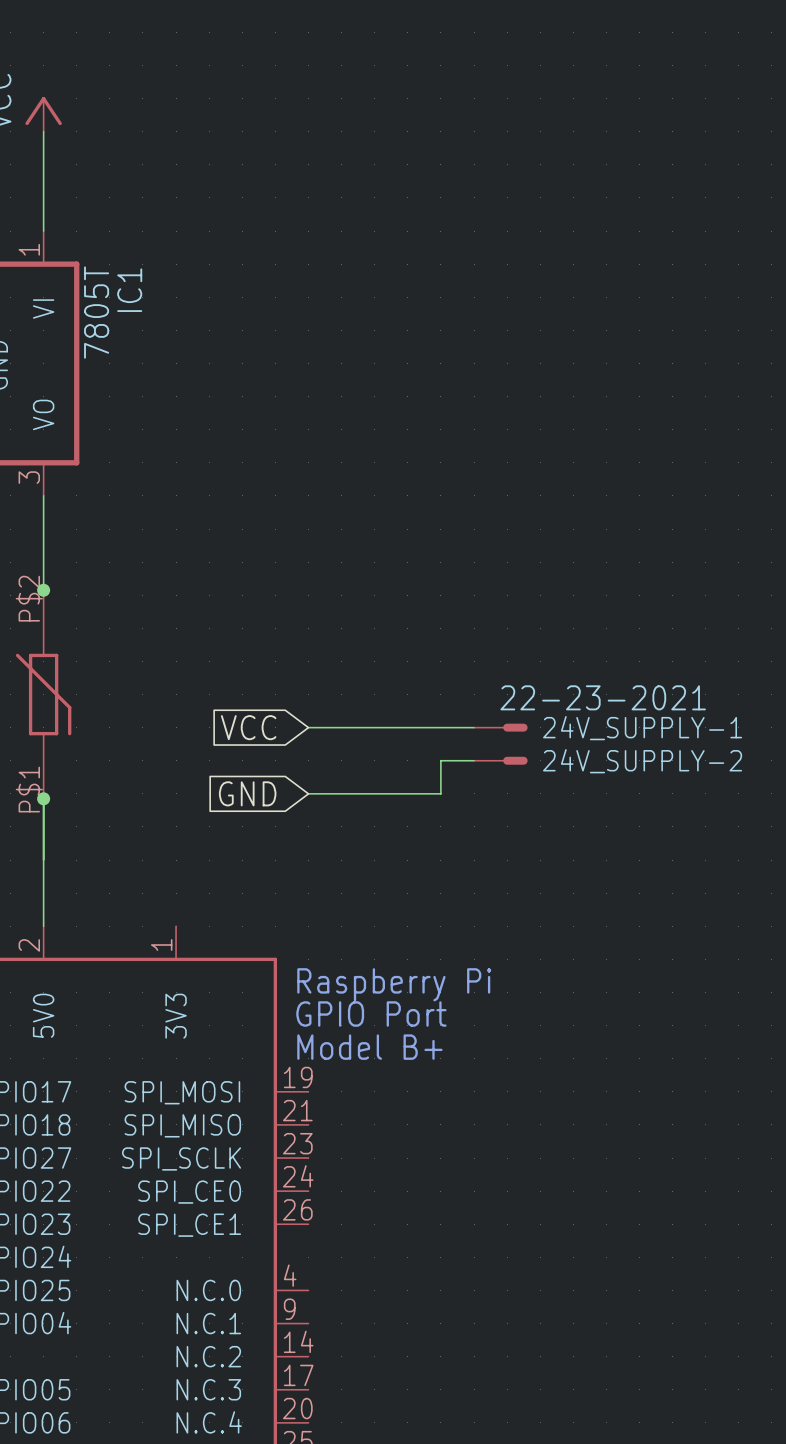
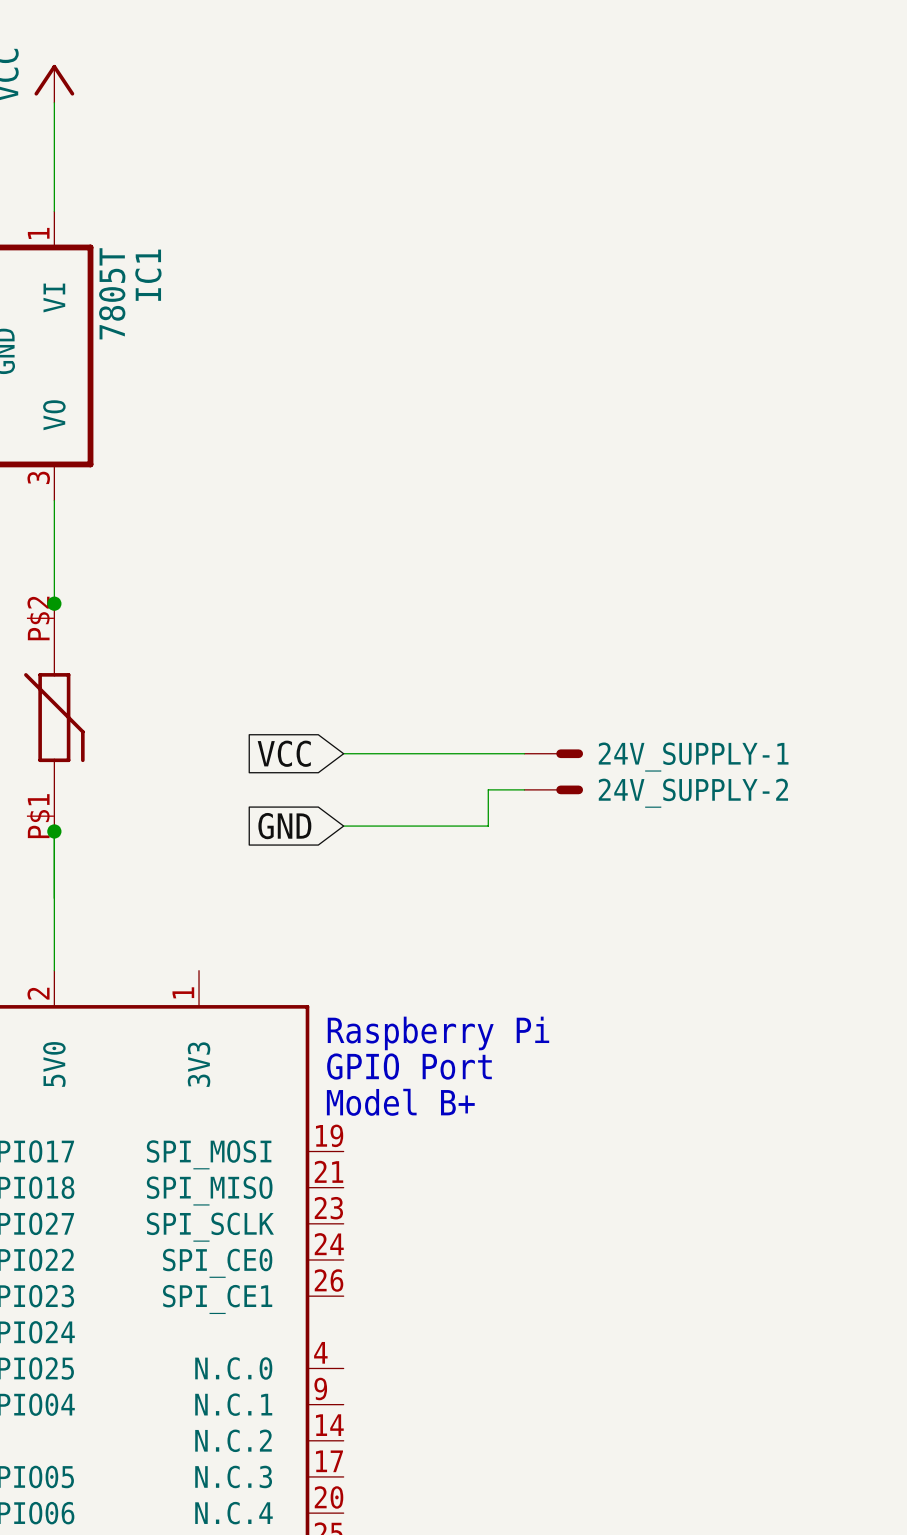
24V_SUPPLY-1 value: 22-23-2021 (603, 697) -> none

